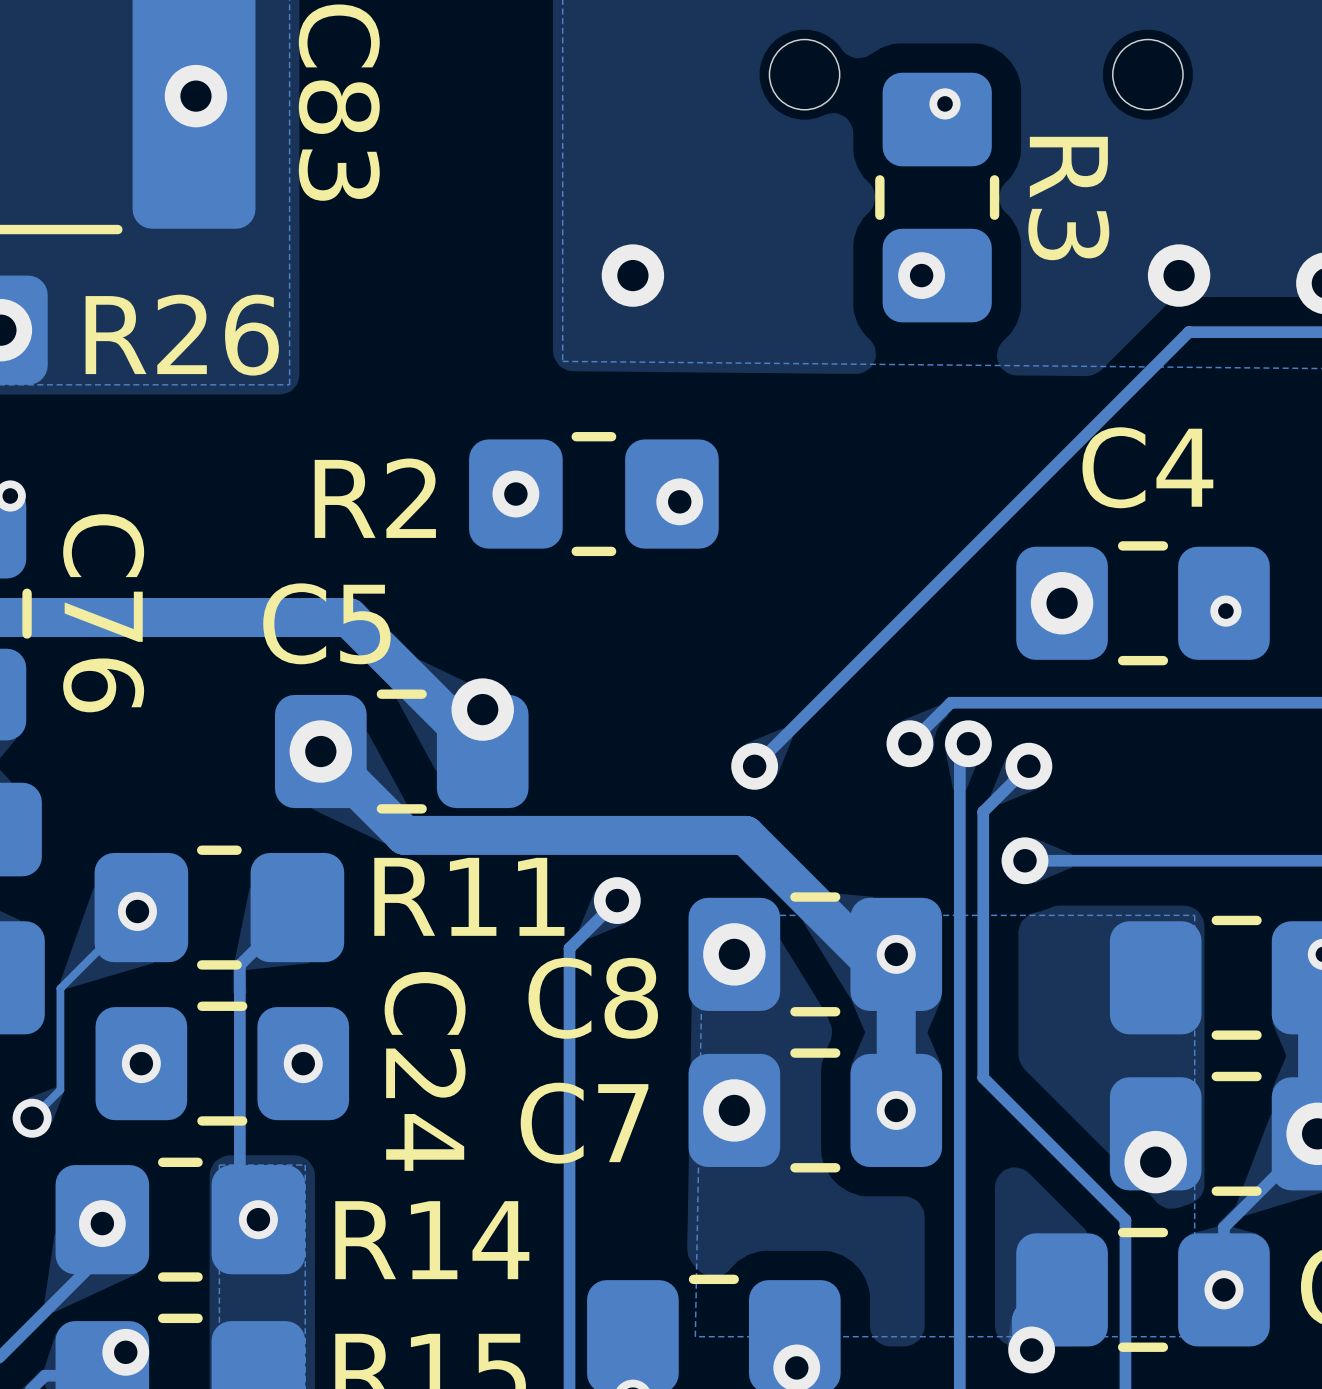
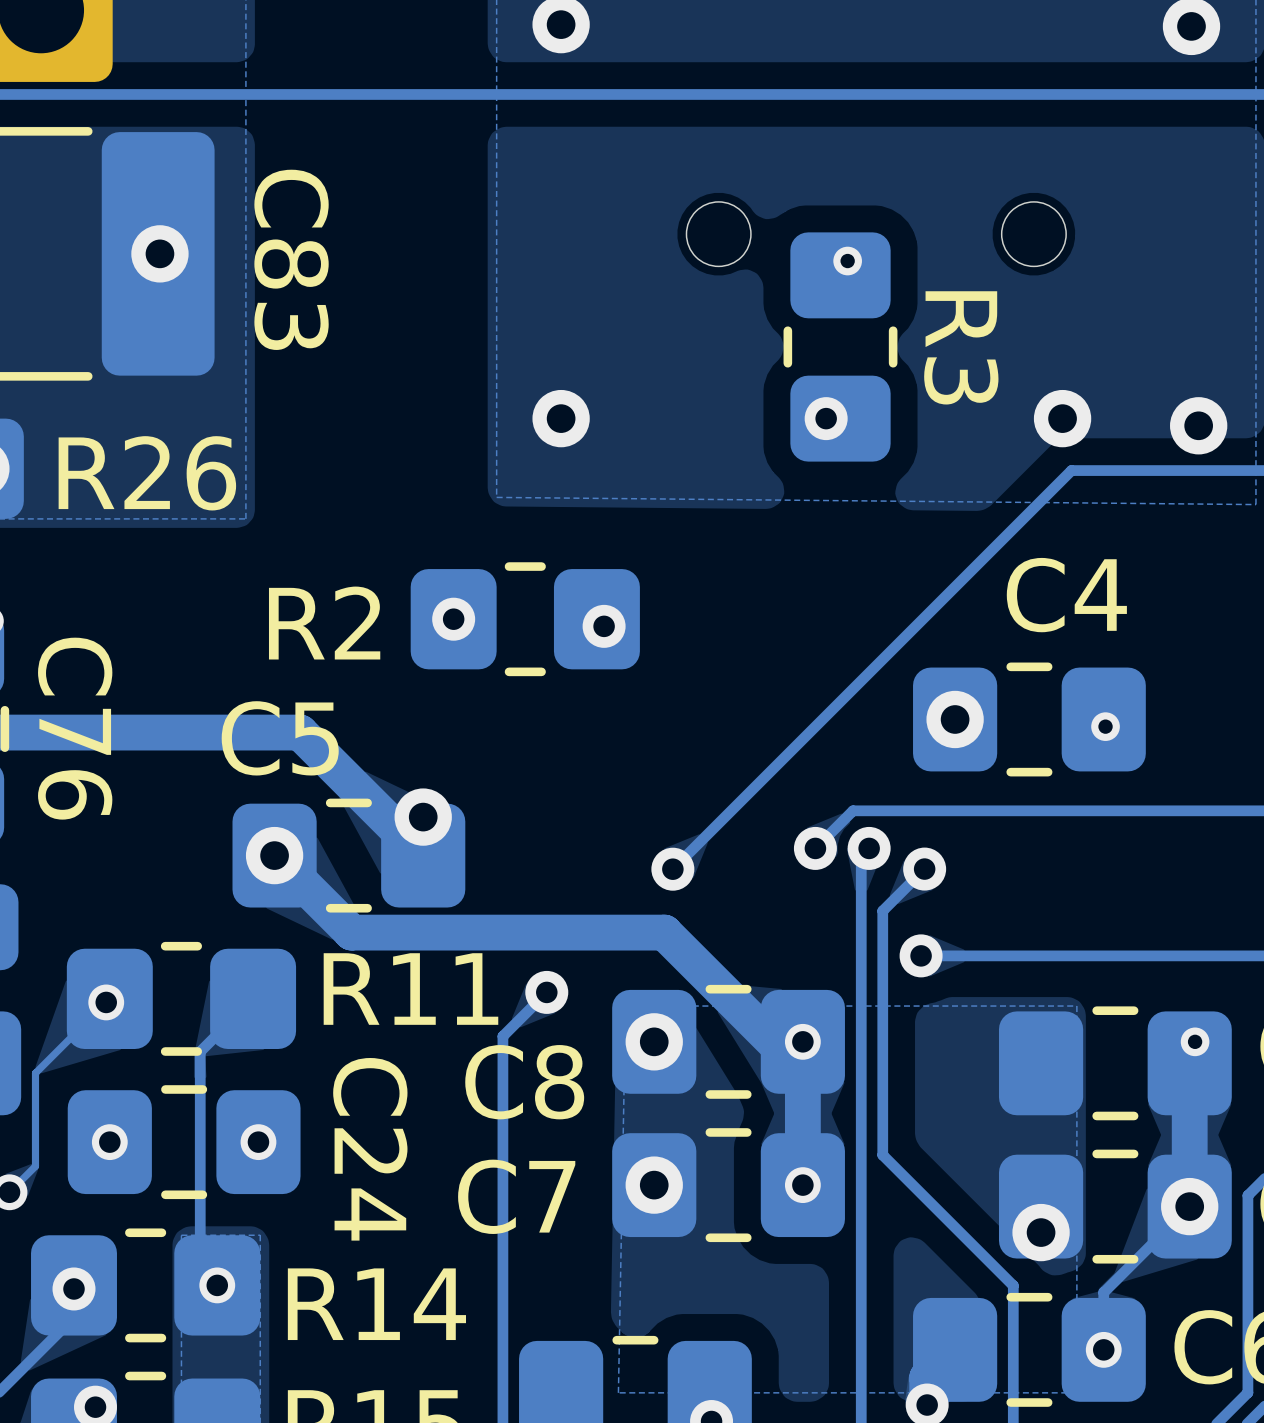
C4 name position: C4 (1147, 467) -> C4 (1066, 595)

